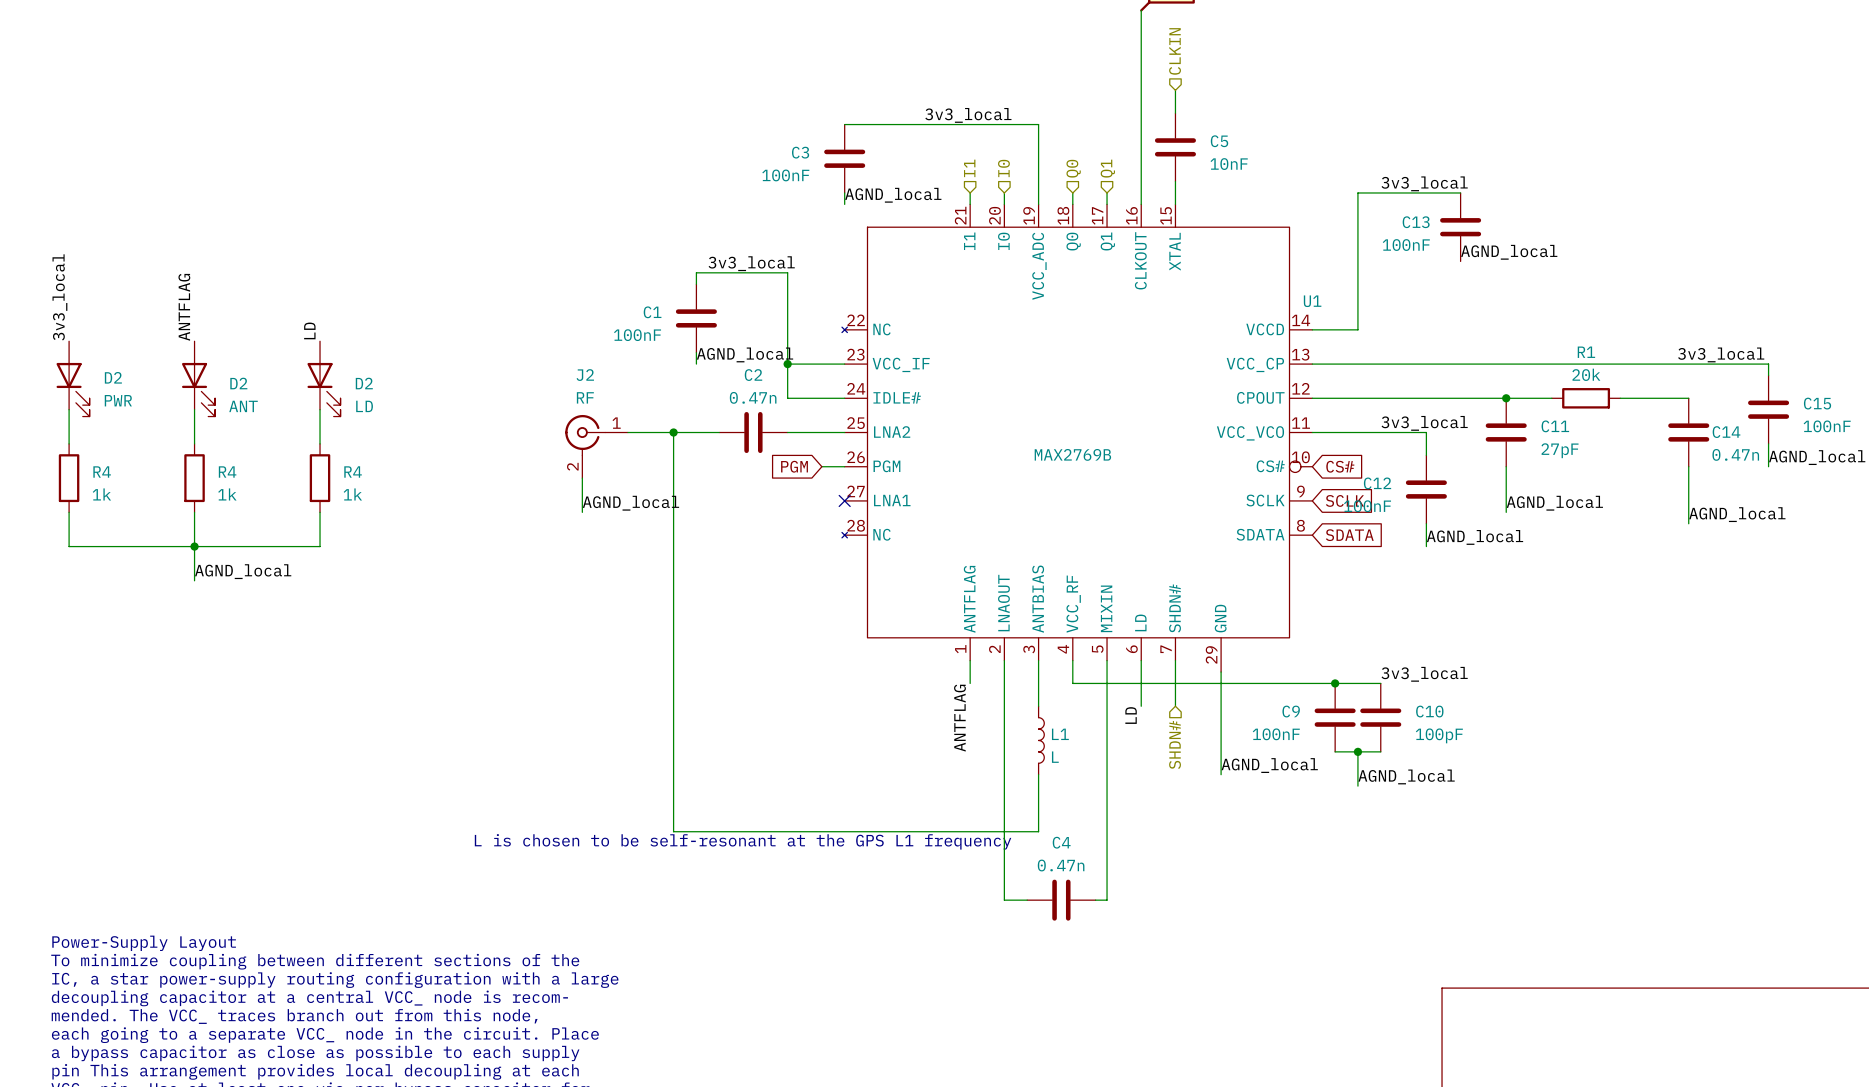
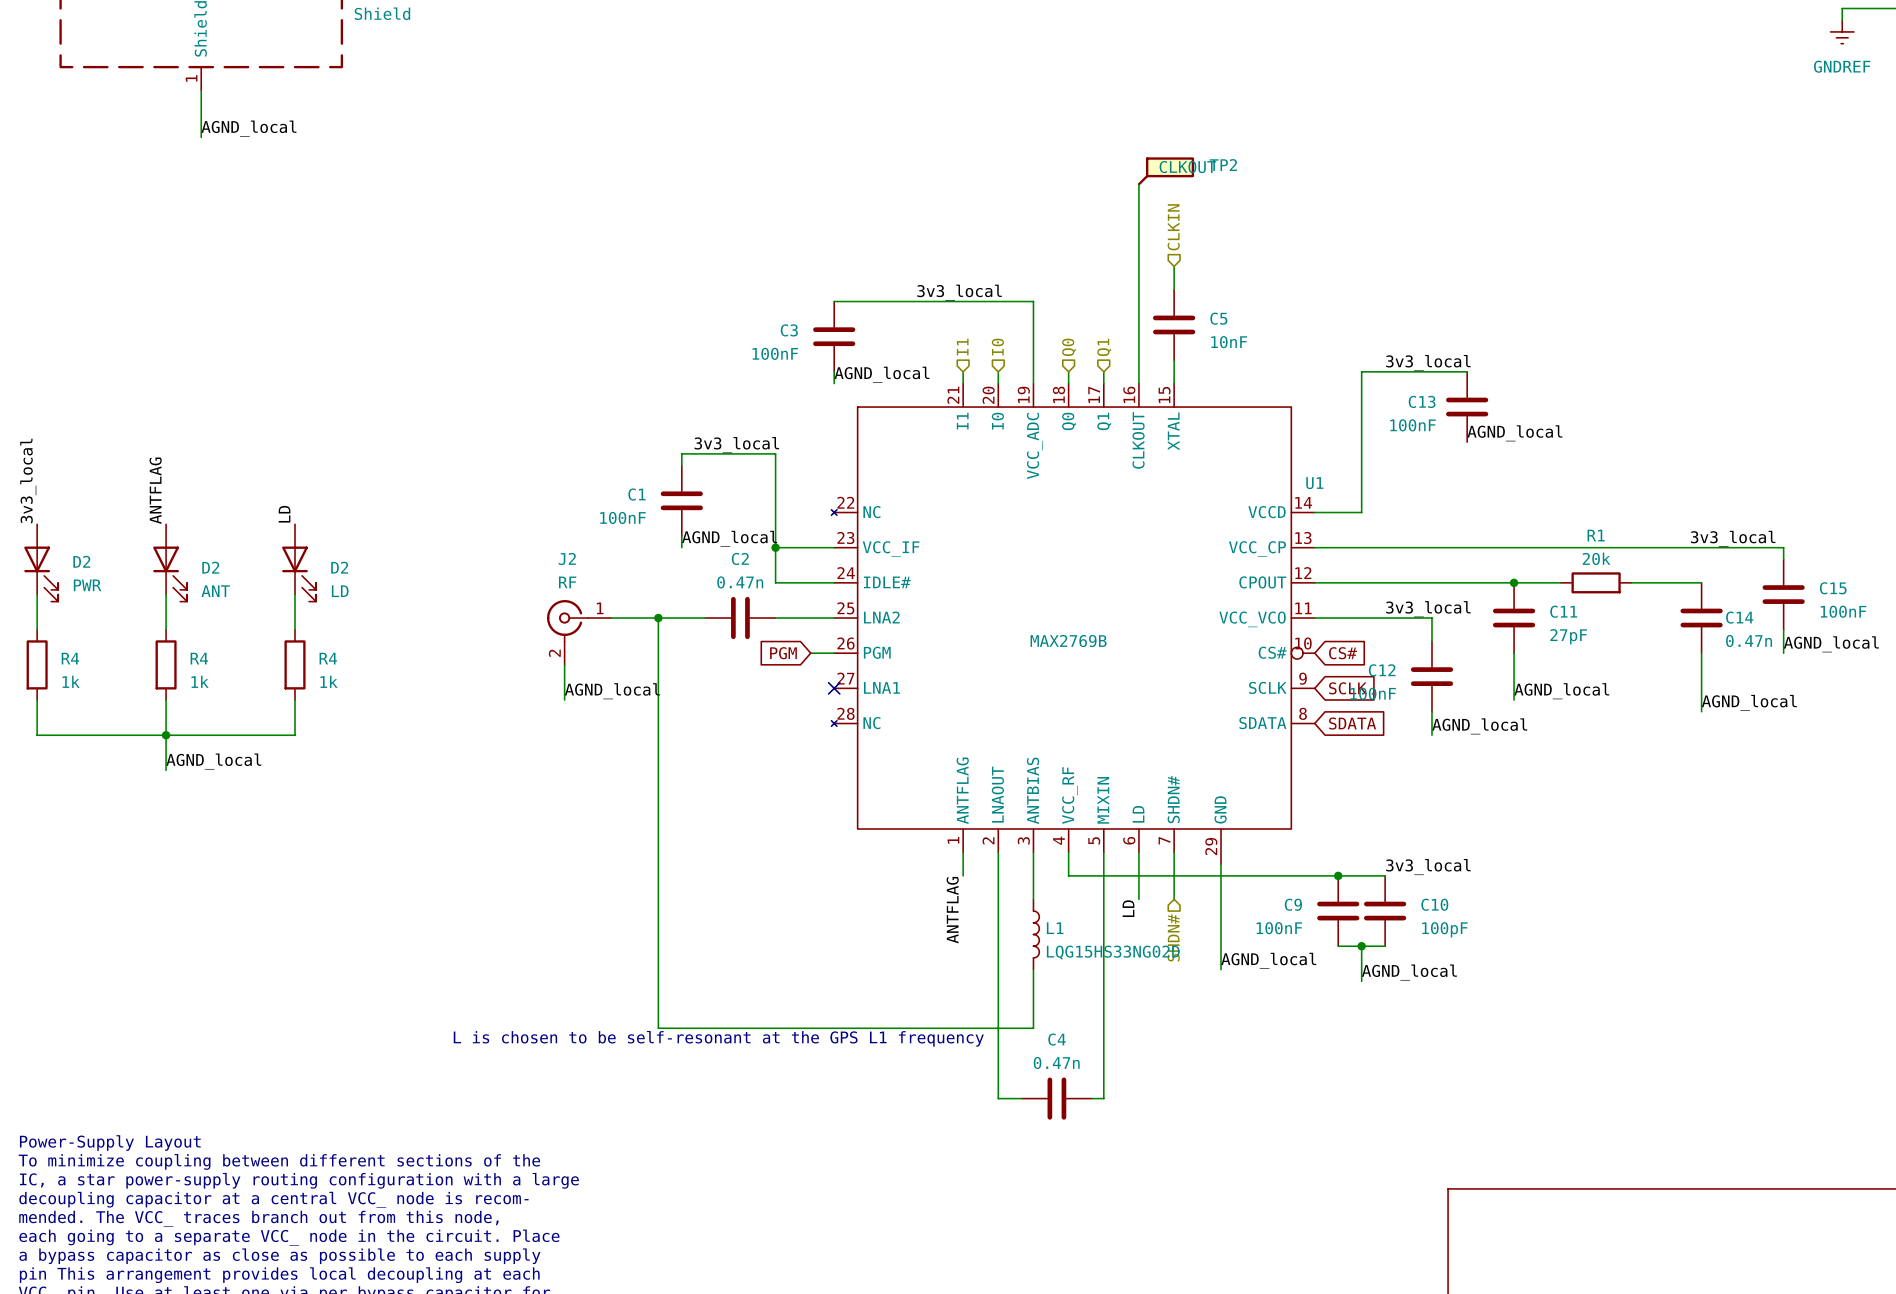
L1 value: L (1055, 757) -> LQG15HS33NG02D (1113, 952)

